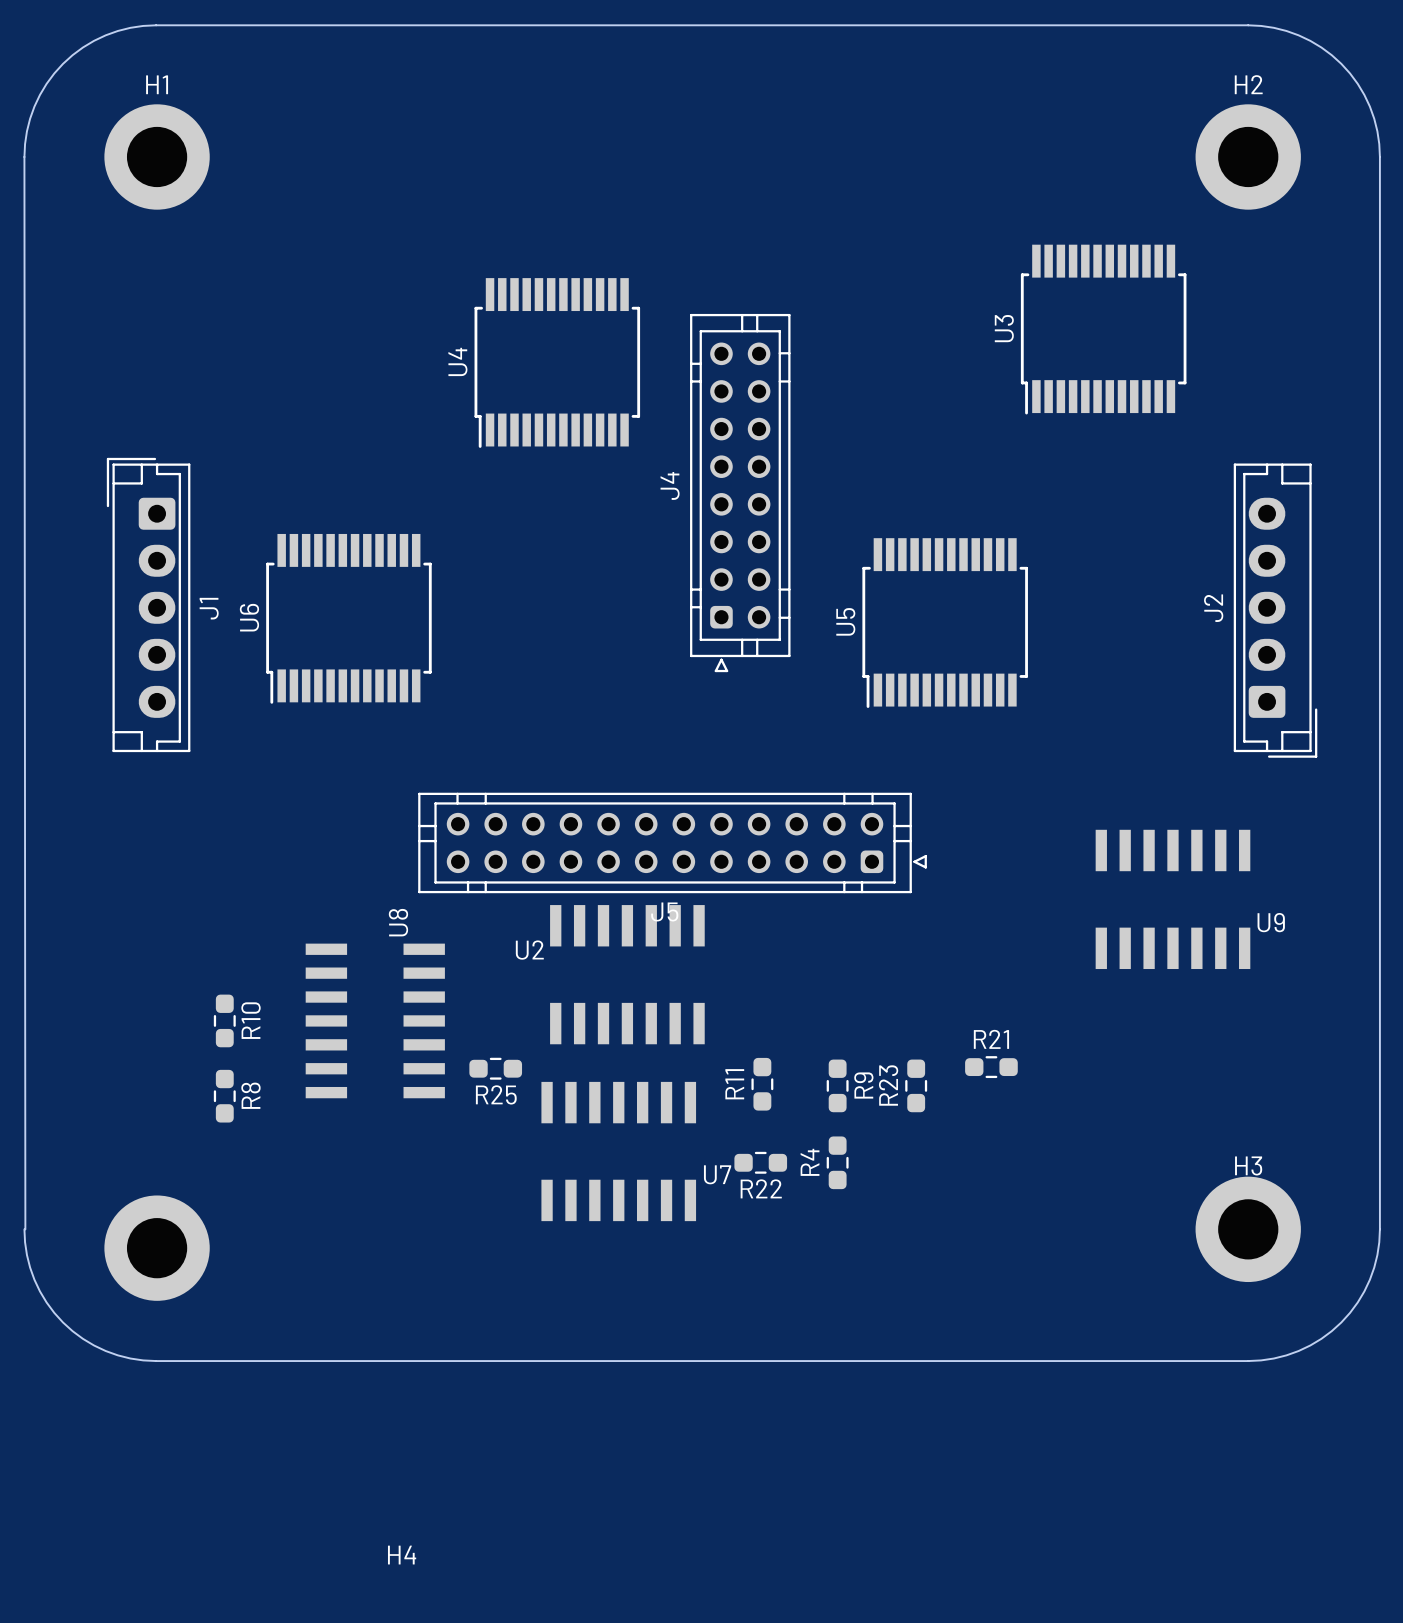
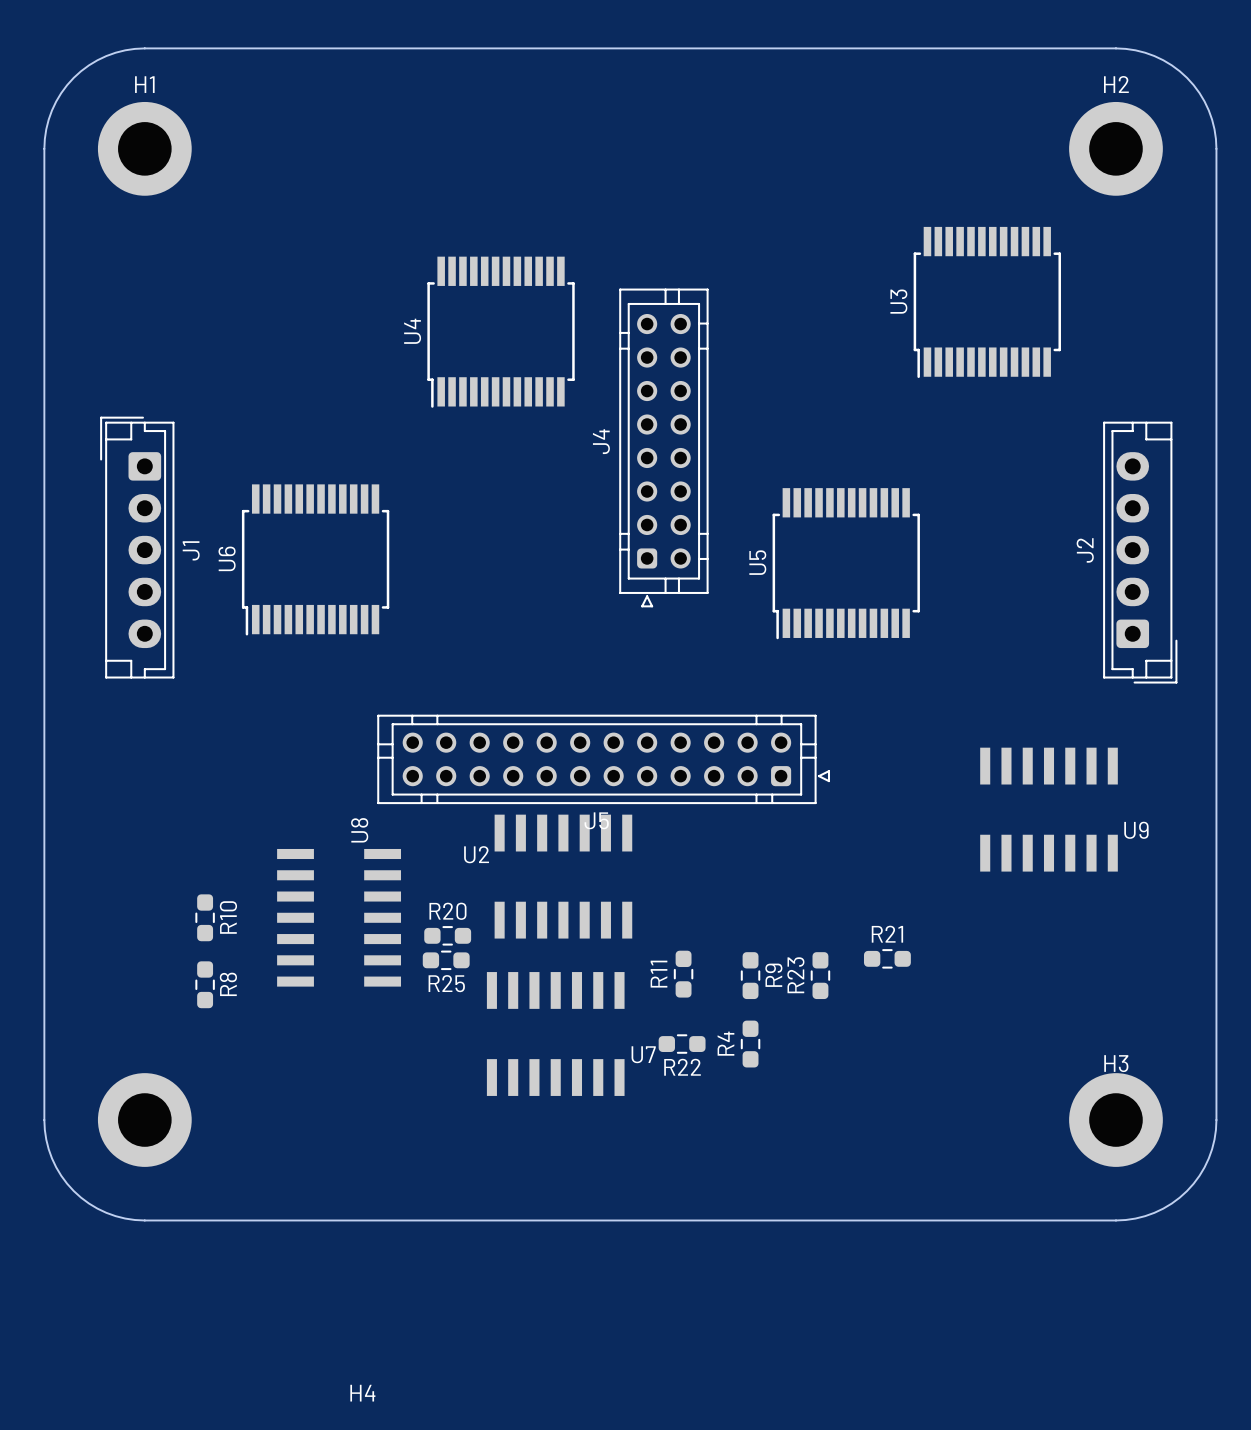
R20: none -> (447, 935)
board edge: (24, 1229) (26, 1255) (34, 1279) (46, 1302) (63, 1322) (82, 1338) (105, 1351) (130, 1358) (157, 1361) -> none
board edge: (25, 1229) (24, 156) (26, 131) (34, 106) (46, 83) (63, 63) (82, 47) (105, 35) (130, 27) (156, 25) (1261, 25) (1298, 35) (1321, 47) (1341, 63) (1364, 94) (1374, 118) (1379, 144) (1379, 1229) (1377, 1255) (1369, 1279) (1357, 1302) (1341, 1322) (1321, 1338) (1298, 1351) (1273, 1358) (1248, 1361) -> (144, 1220) (125, 1218) (106, 1212) (89, 1203) (73, 1191) (61, 1175) (52, 1158) (46, 1139) (44, 1120) (44, 139) (48, 119) (56, 101) (67, 85) (81, 71) (97, 60) (115, 52) (144, 48) (1115, 48) (1135, 50) (1154, 56) (1179, 71) (1193, 85) (1204, 101) (1212, 119) (1216, 148) (1215, 1129) (1208, 1158) (1199, 1175) (1187, 1191) (1171, 1203) (1154, 1212) (1135, 1218) (1115, 1220)
H3 position: (1248, 1229) -> (1115, 1120)

